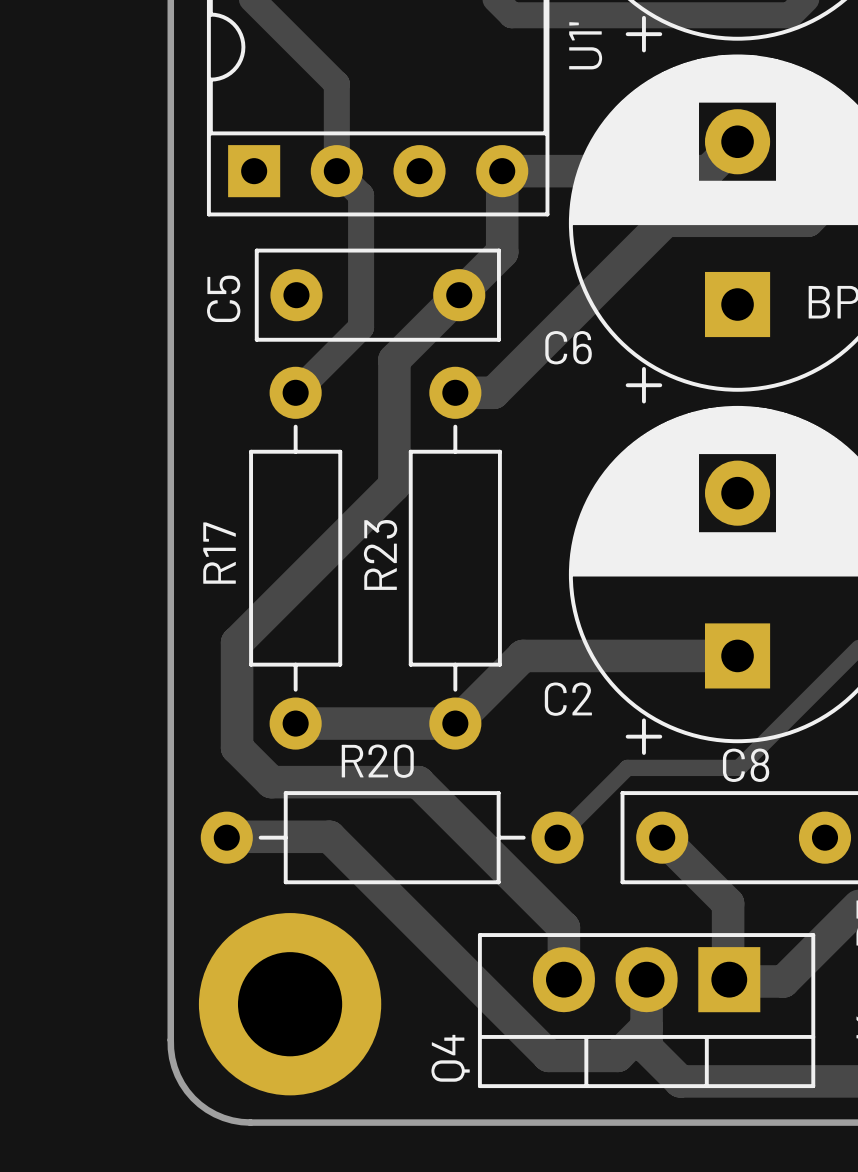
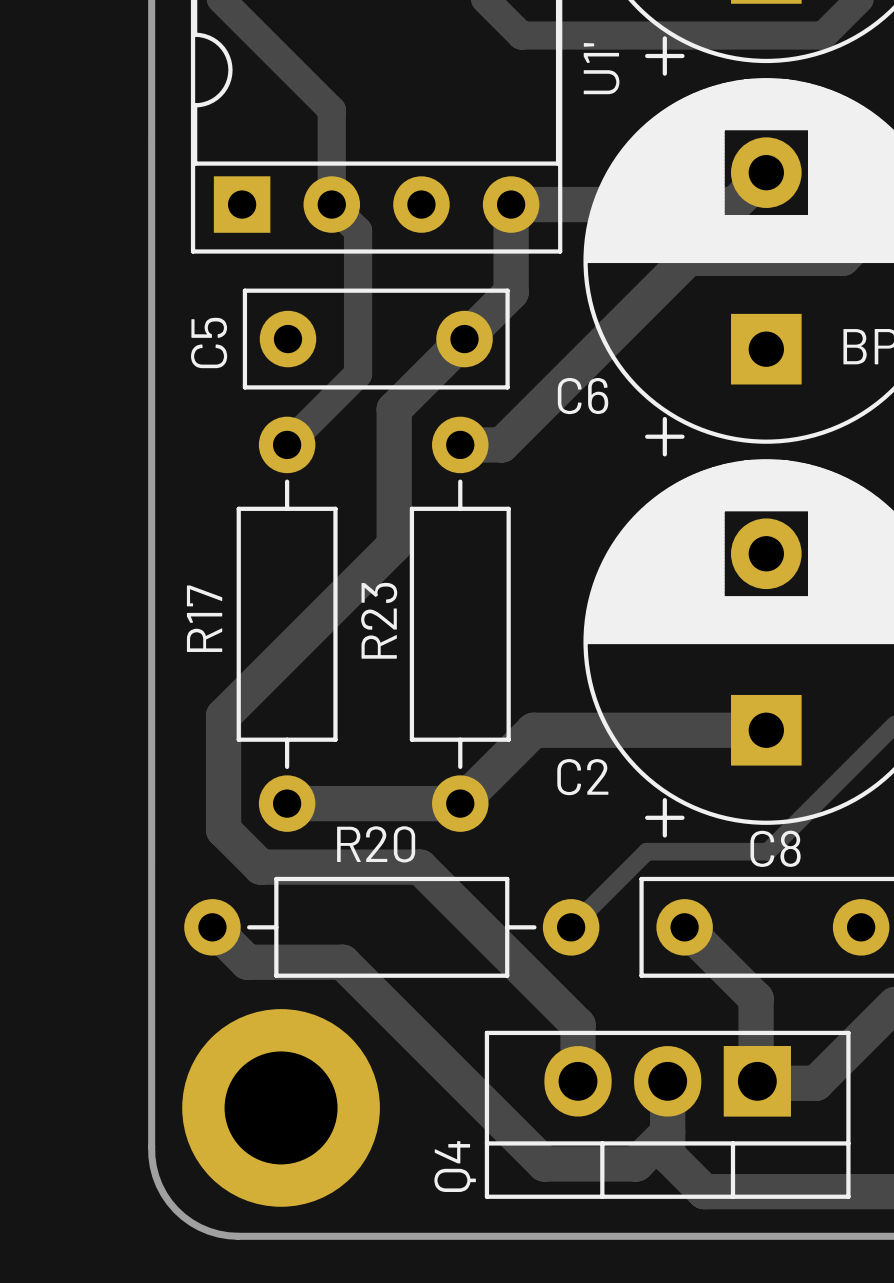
track: (227, 836) (329, 836) (548, 1055) -> (212, 927) (247, 962) (342, 962) (544, 1163) (561, 1163)

